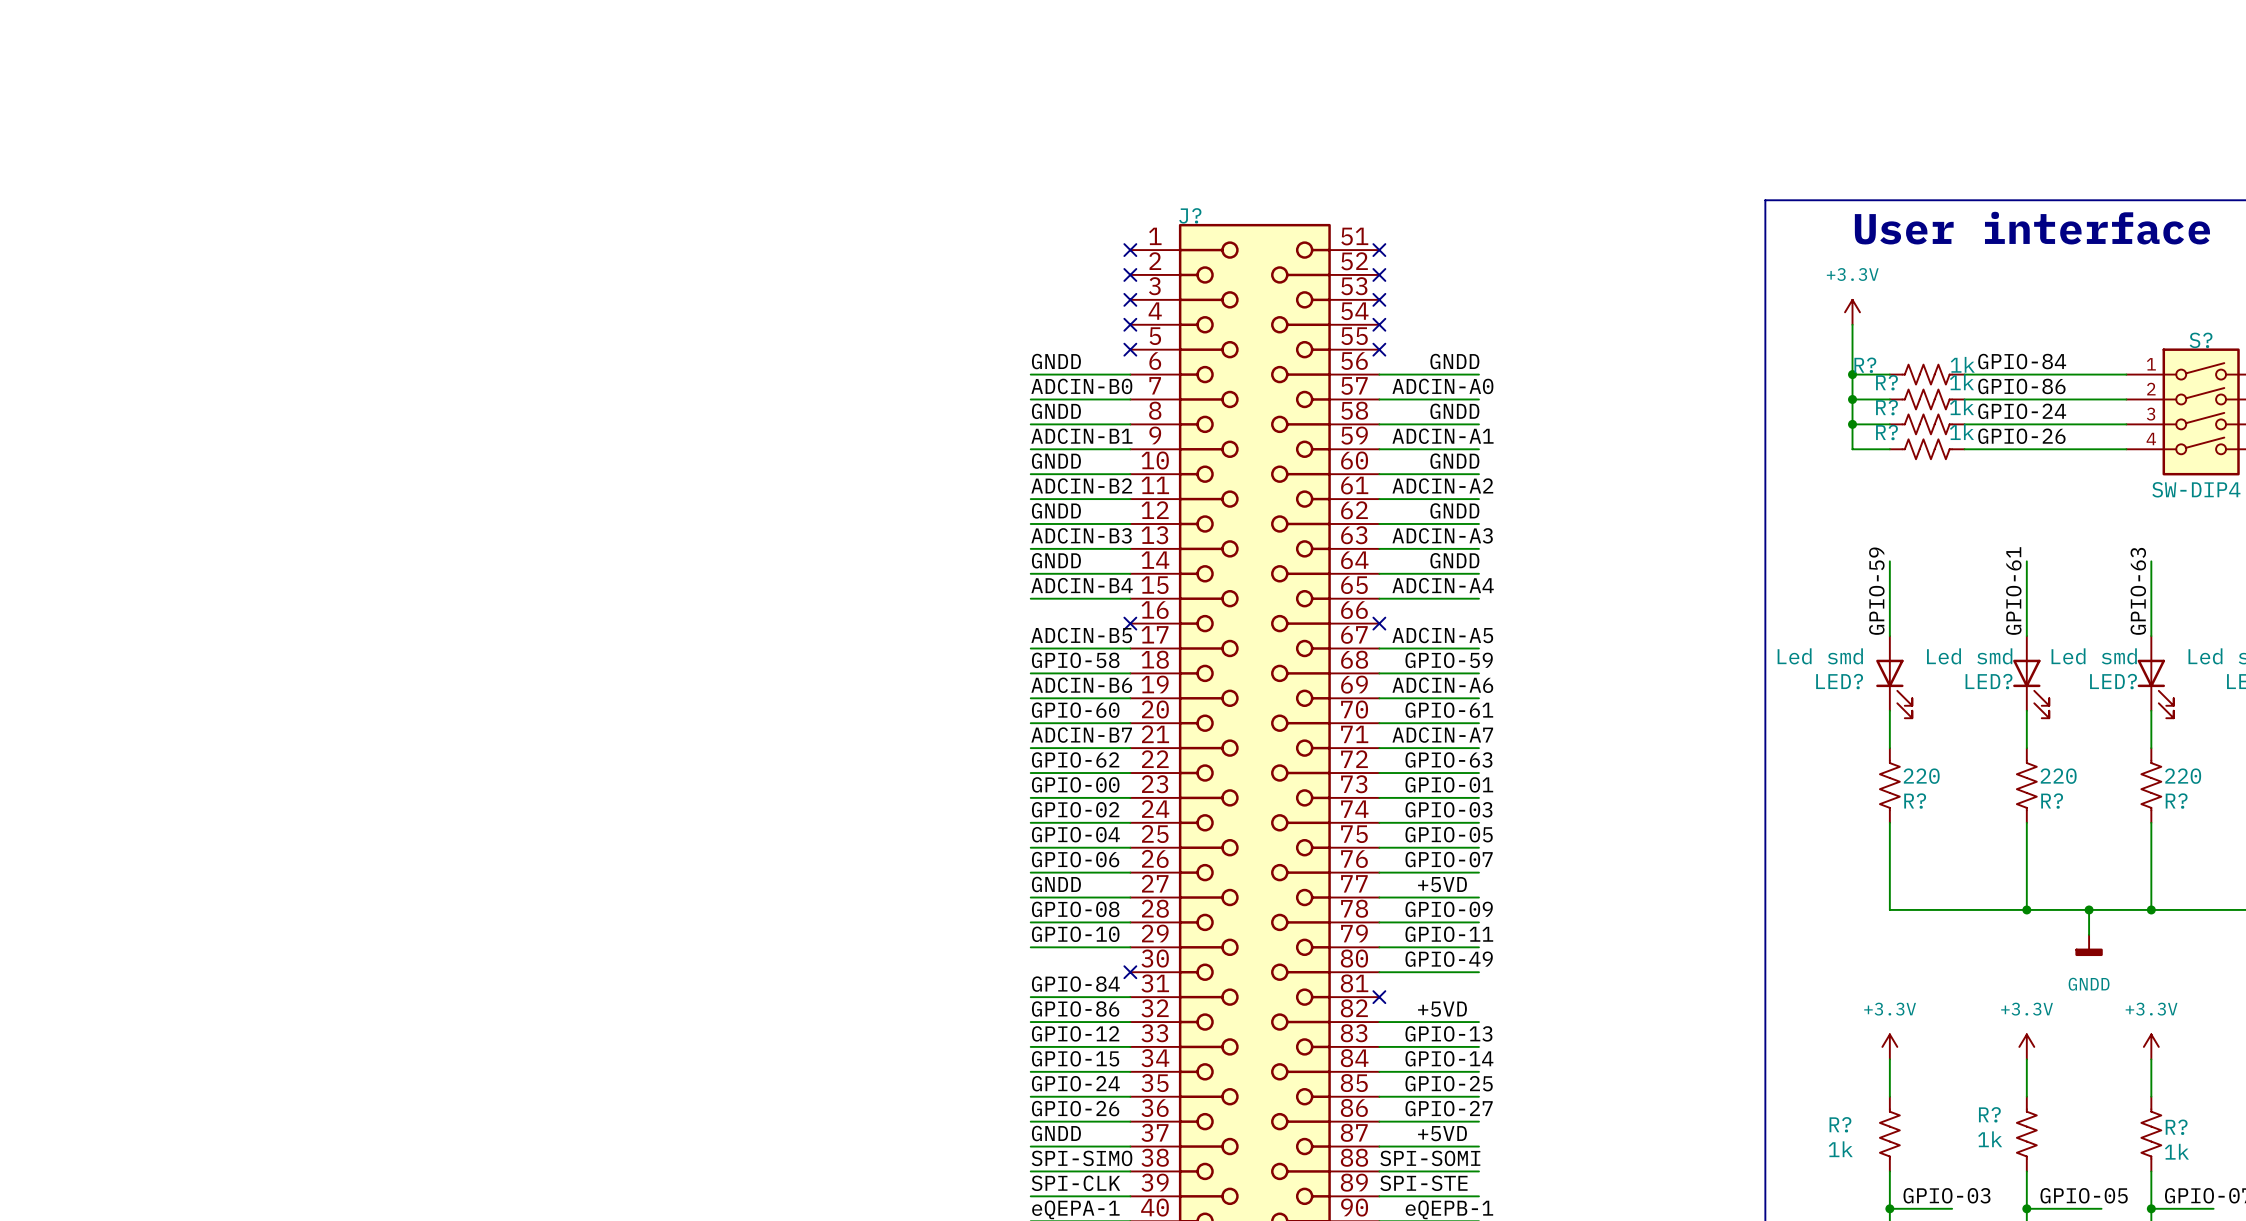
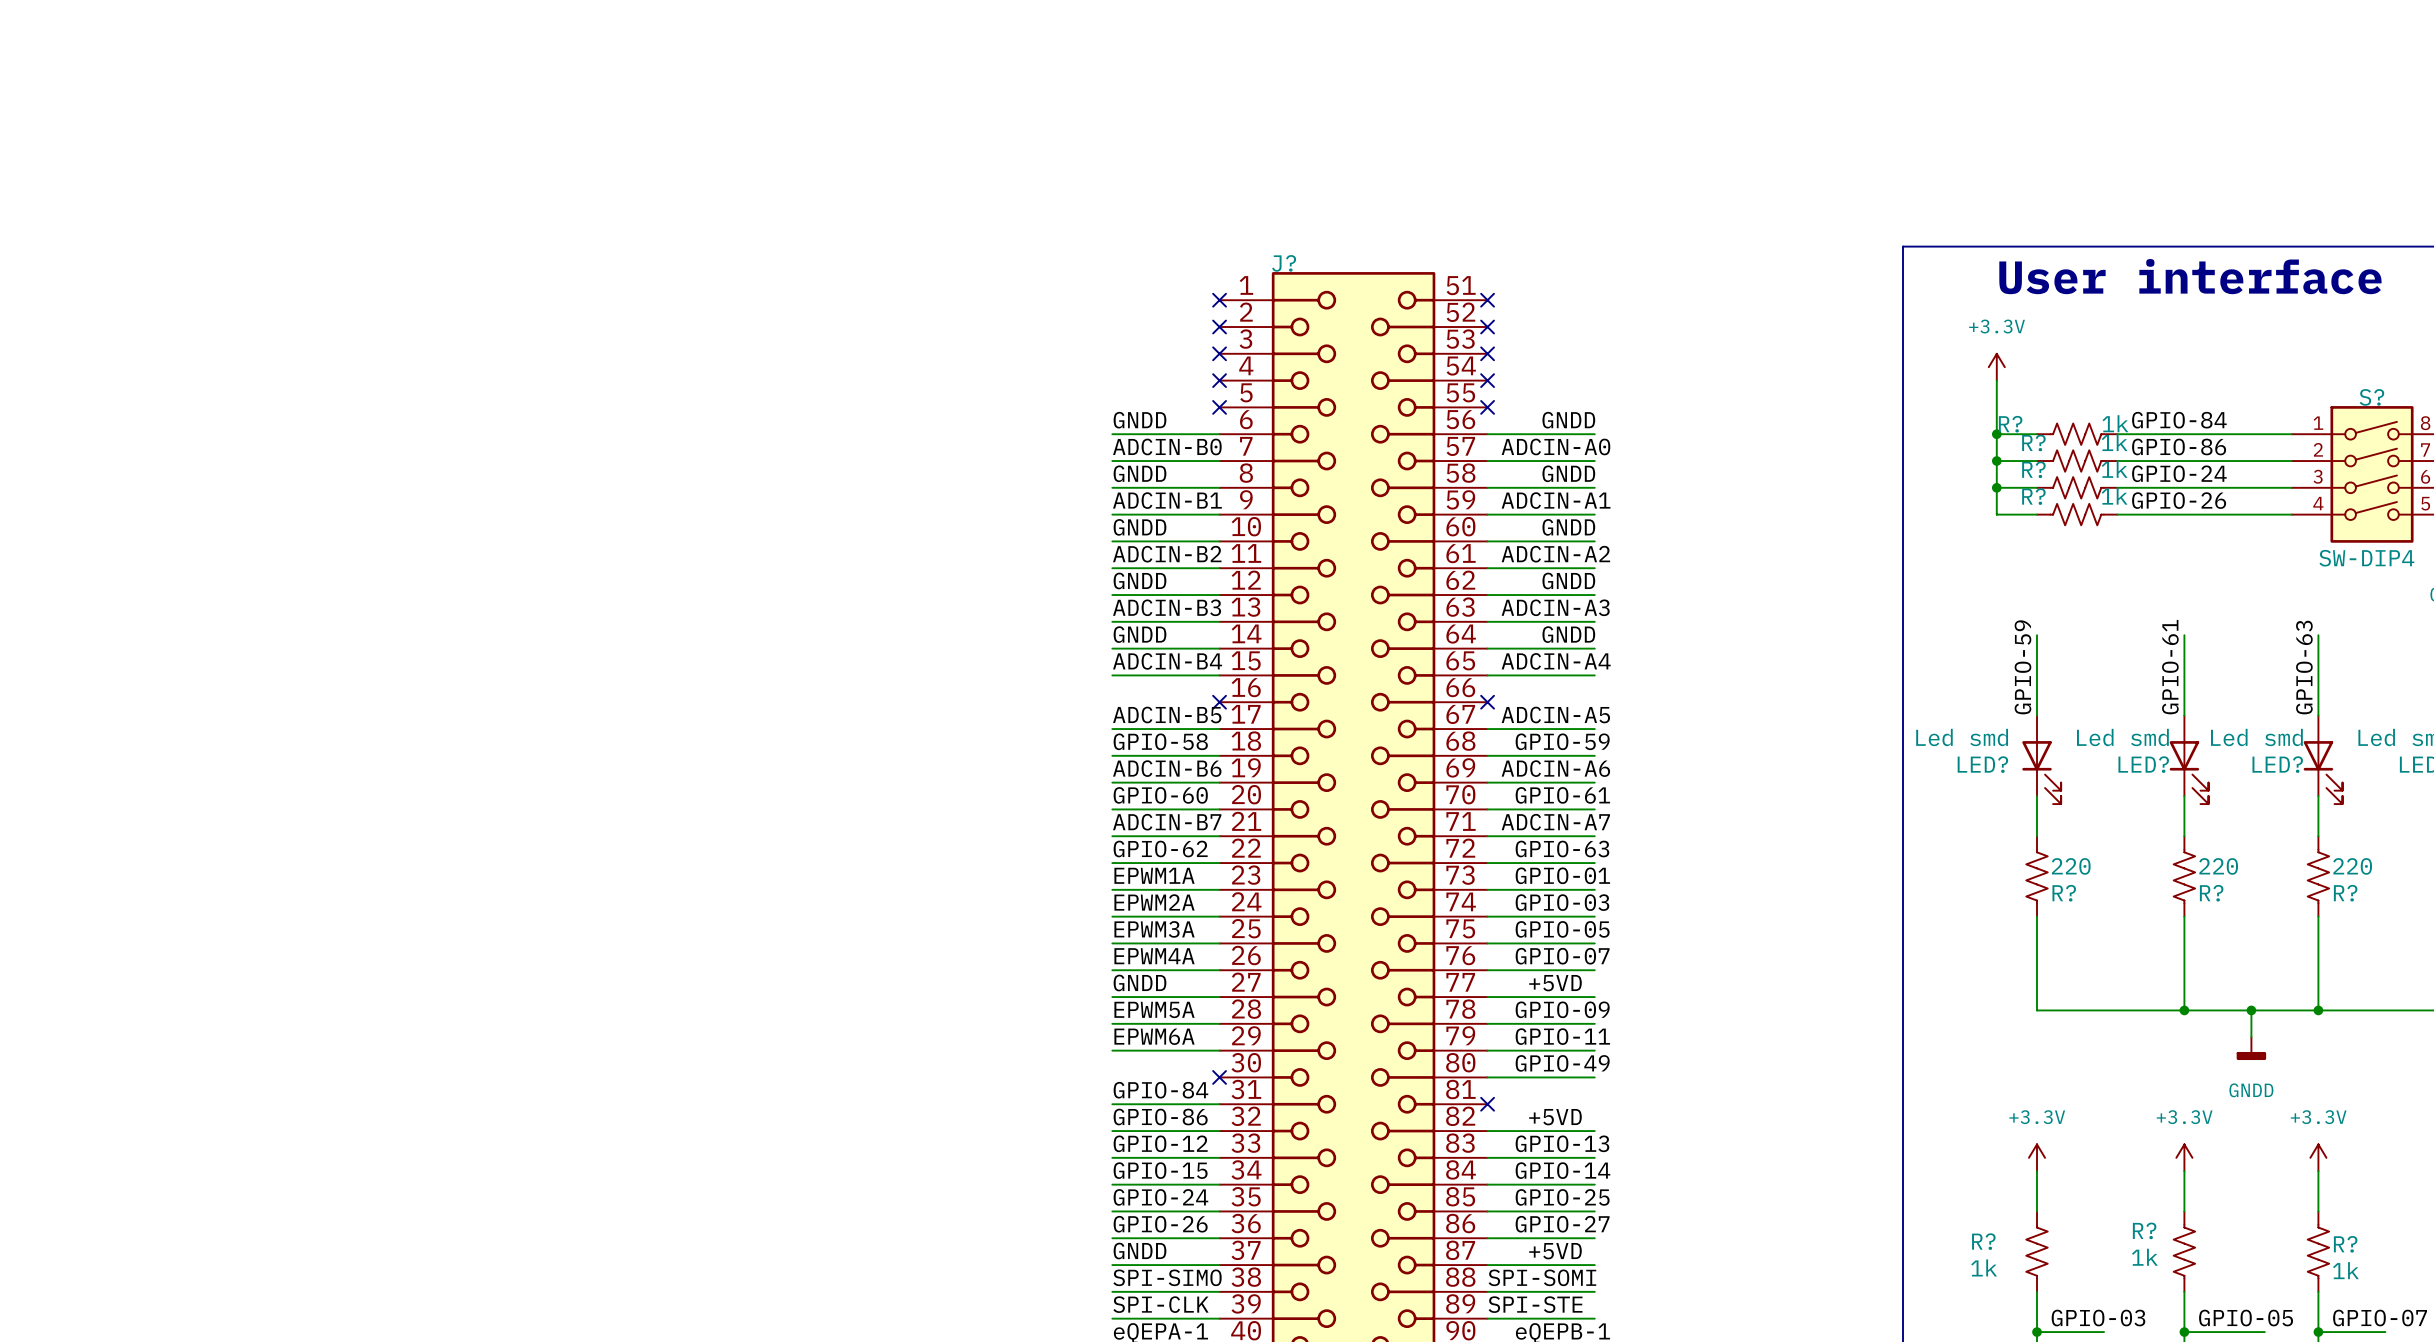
label: GPIO-00 (1075, 784) -> EPWM1A (1154, 875)
label: GPIO-02 (1075, 809) -> EPWM2A (1154, 902)
label: GPIO-04 (1075, 834) -> EPWM3A (1154, 929)
label: GPIO-06 (1075, 859) -> EPWM4A (1154, 956)
label: GPIO-08 (1075, 909) -> EPWM5A (1154, 1009)
label: GPIO-10 (1075, 934) -> EPWM6A (1154, 1036)

